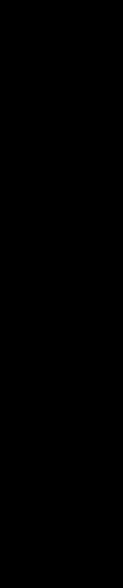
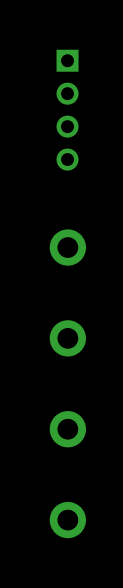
part: none -> (67, 110)
part: none -> (67, 247)
part: none -> (67, 338)
part: none -> (67, 429)
part: none -> (67, 520)

